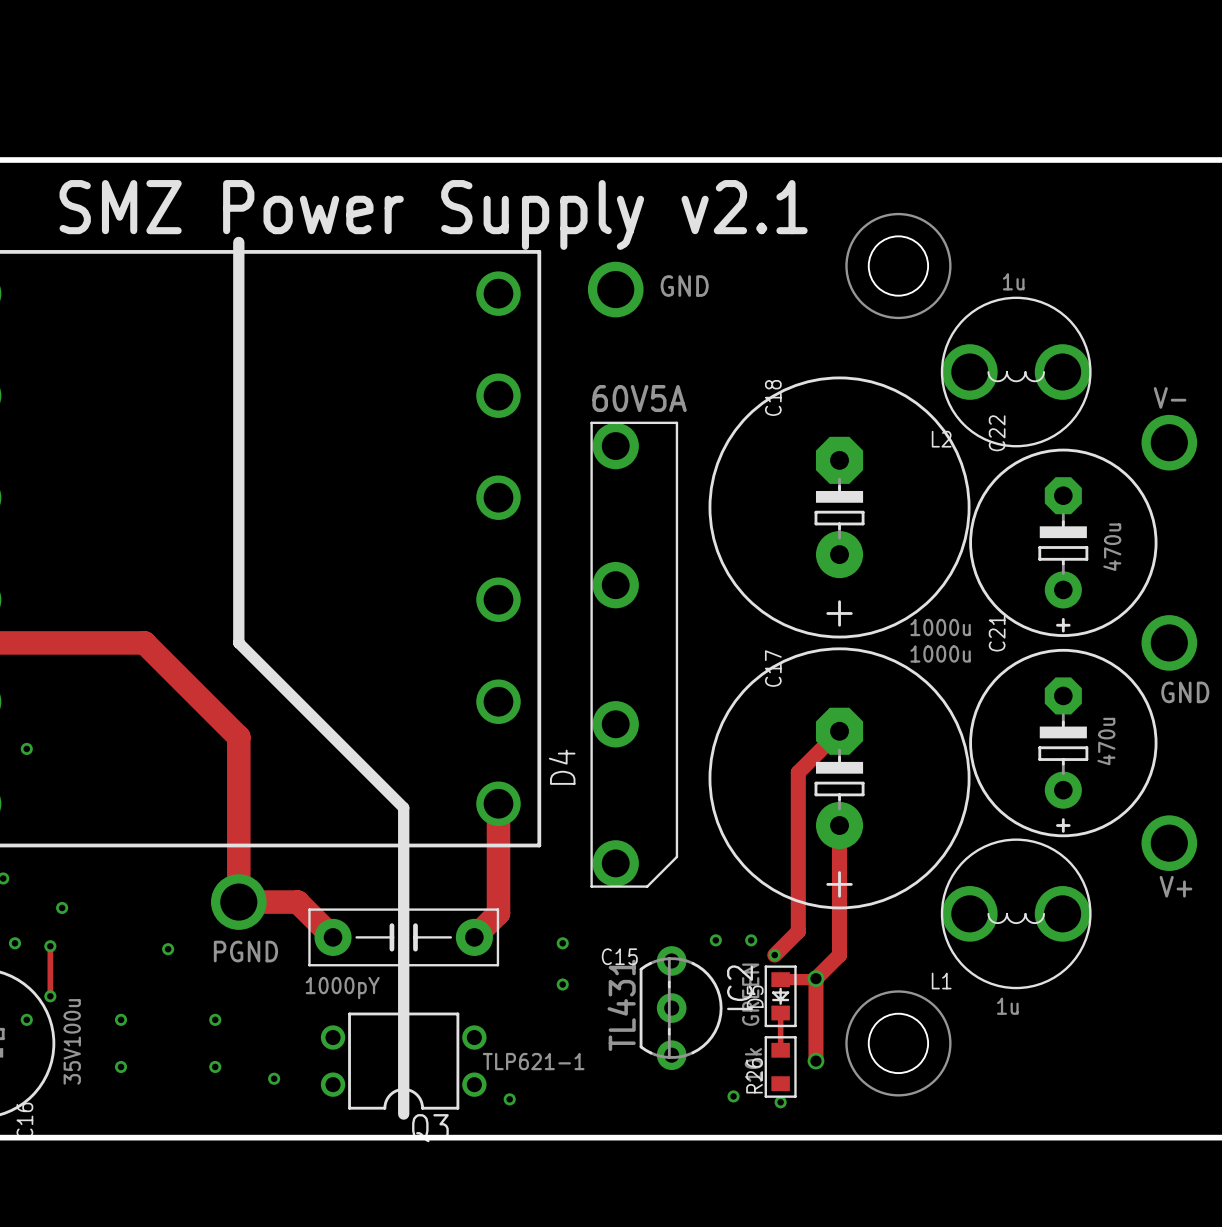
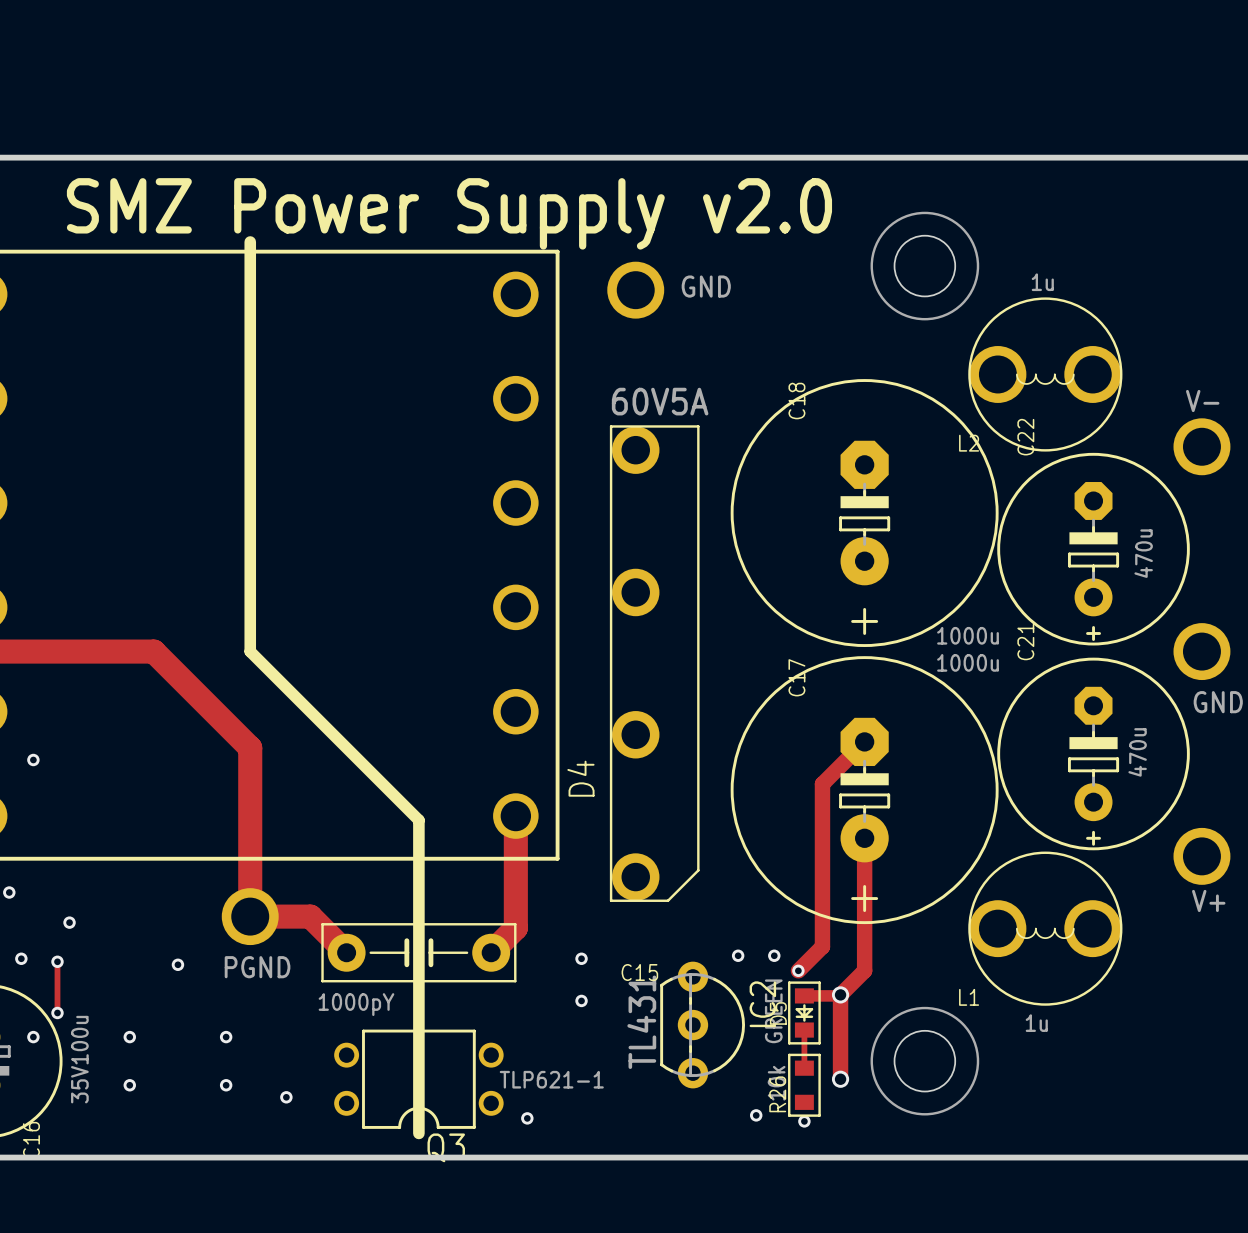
text: SMZ Power Supply v2.1 (433, 214) -> SMZ Power Supply v2.0 (449, 213)

